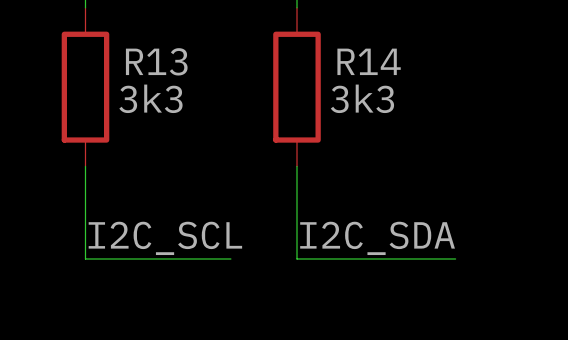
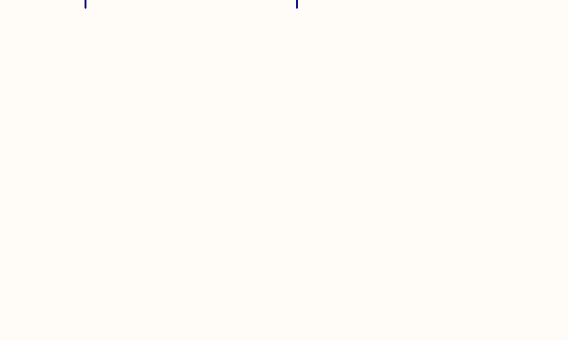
R13: (85, 87) -> none
R14: (296, 87) -> none
wire: (85, 166) (85, 258) (230, 258) -> none
wire: (296, 166) (296, 258) (455, 258) -> none
label: I2C_SCL (165, 238) -> none
label: I2C_SDA (377, 238) -> none

